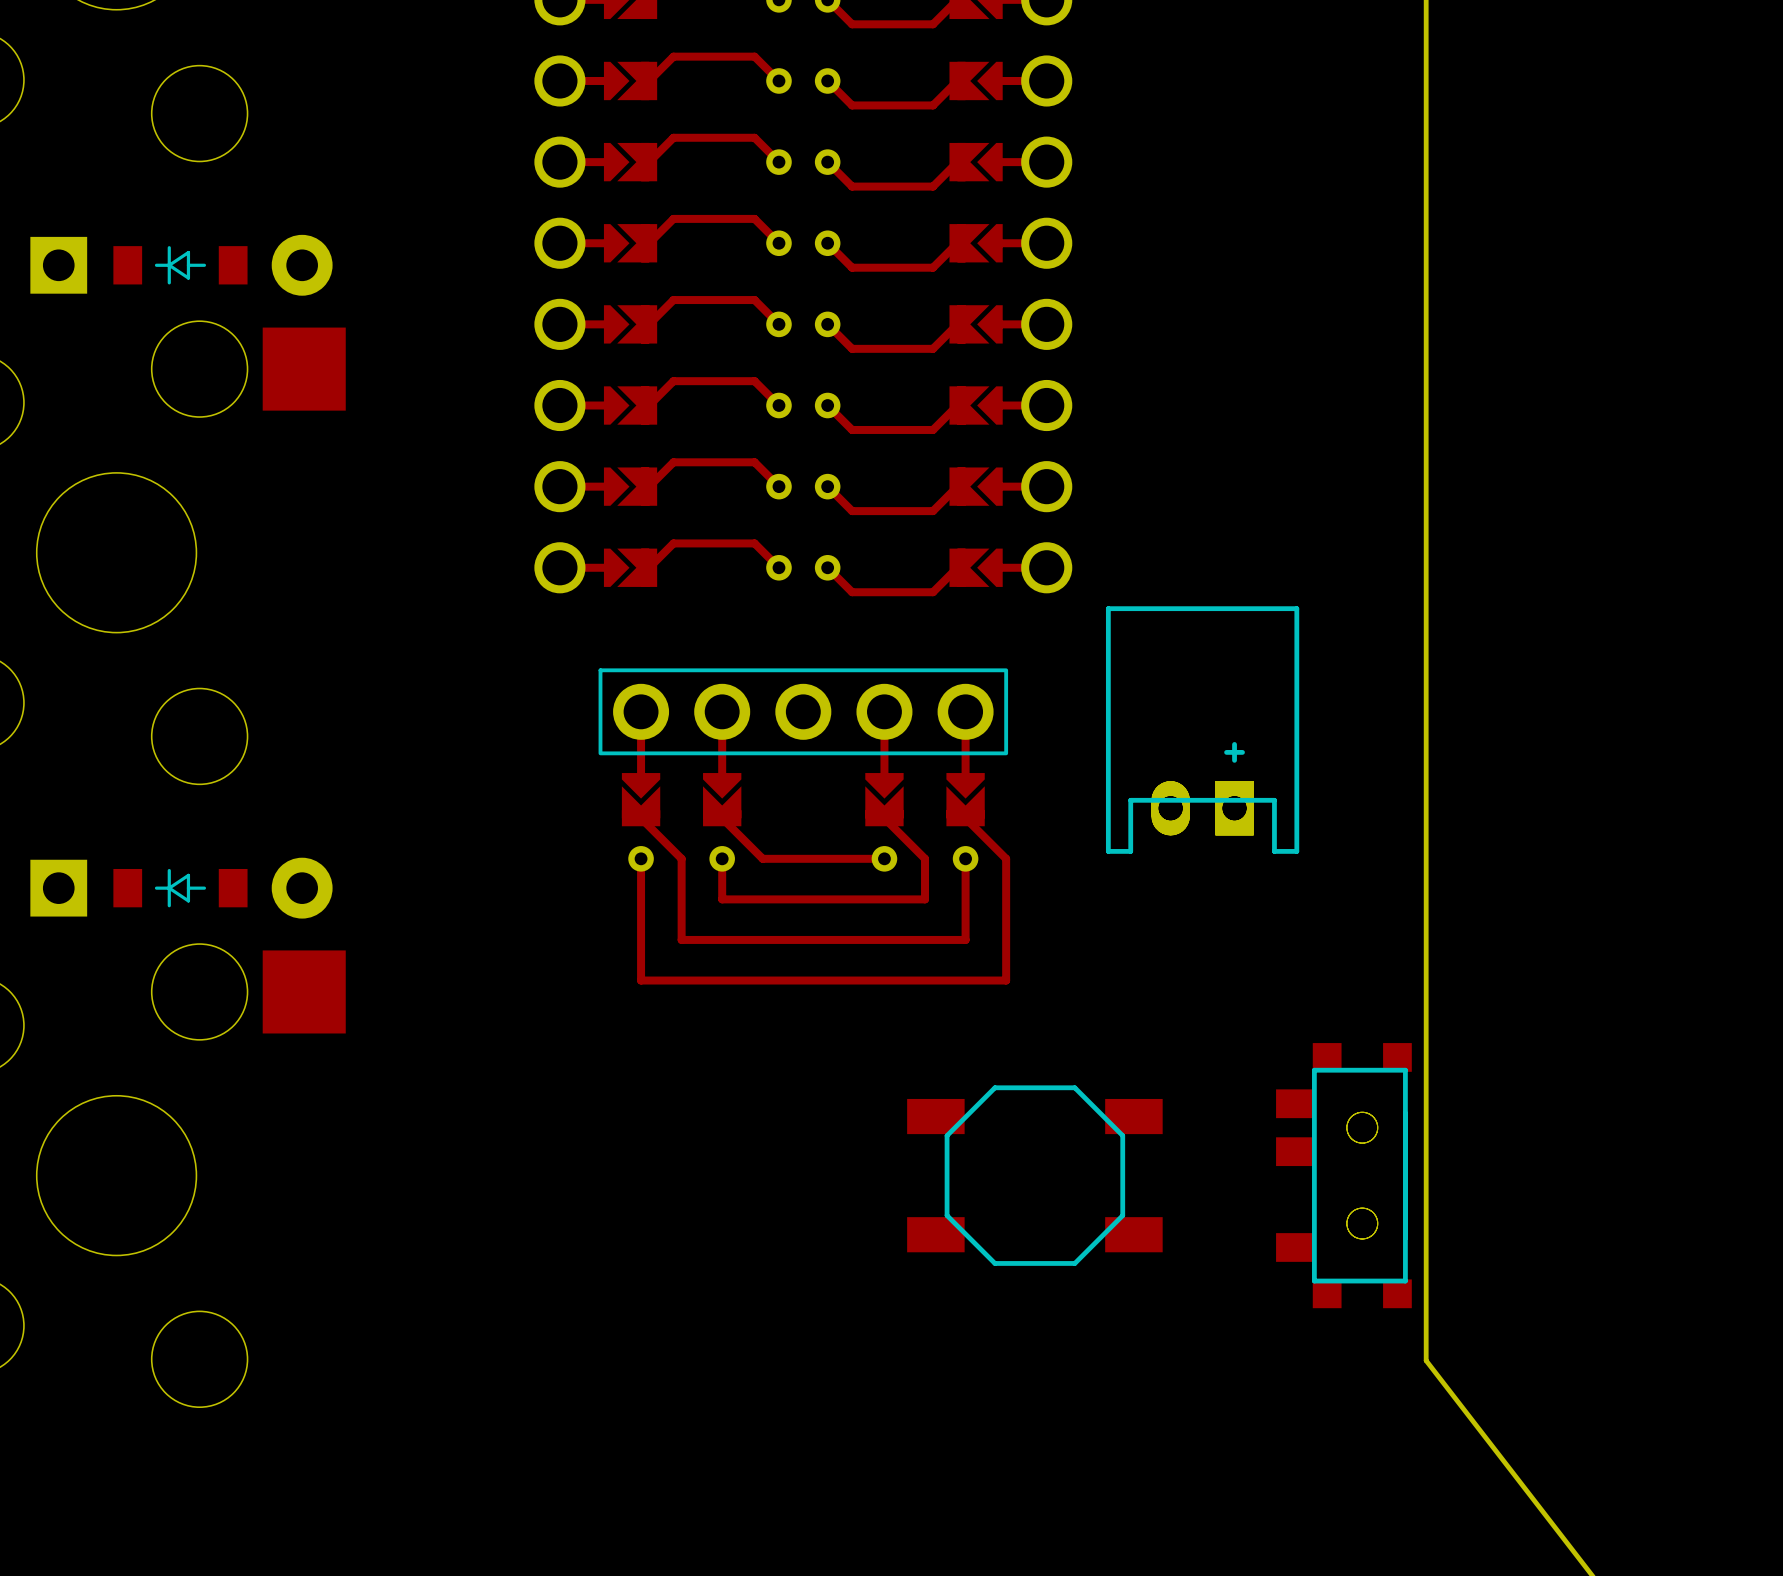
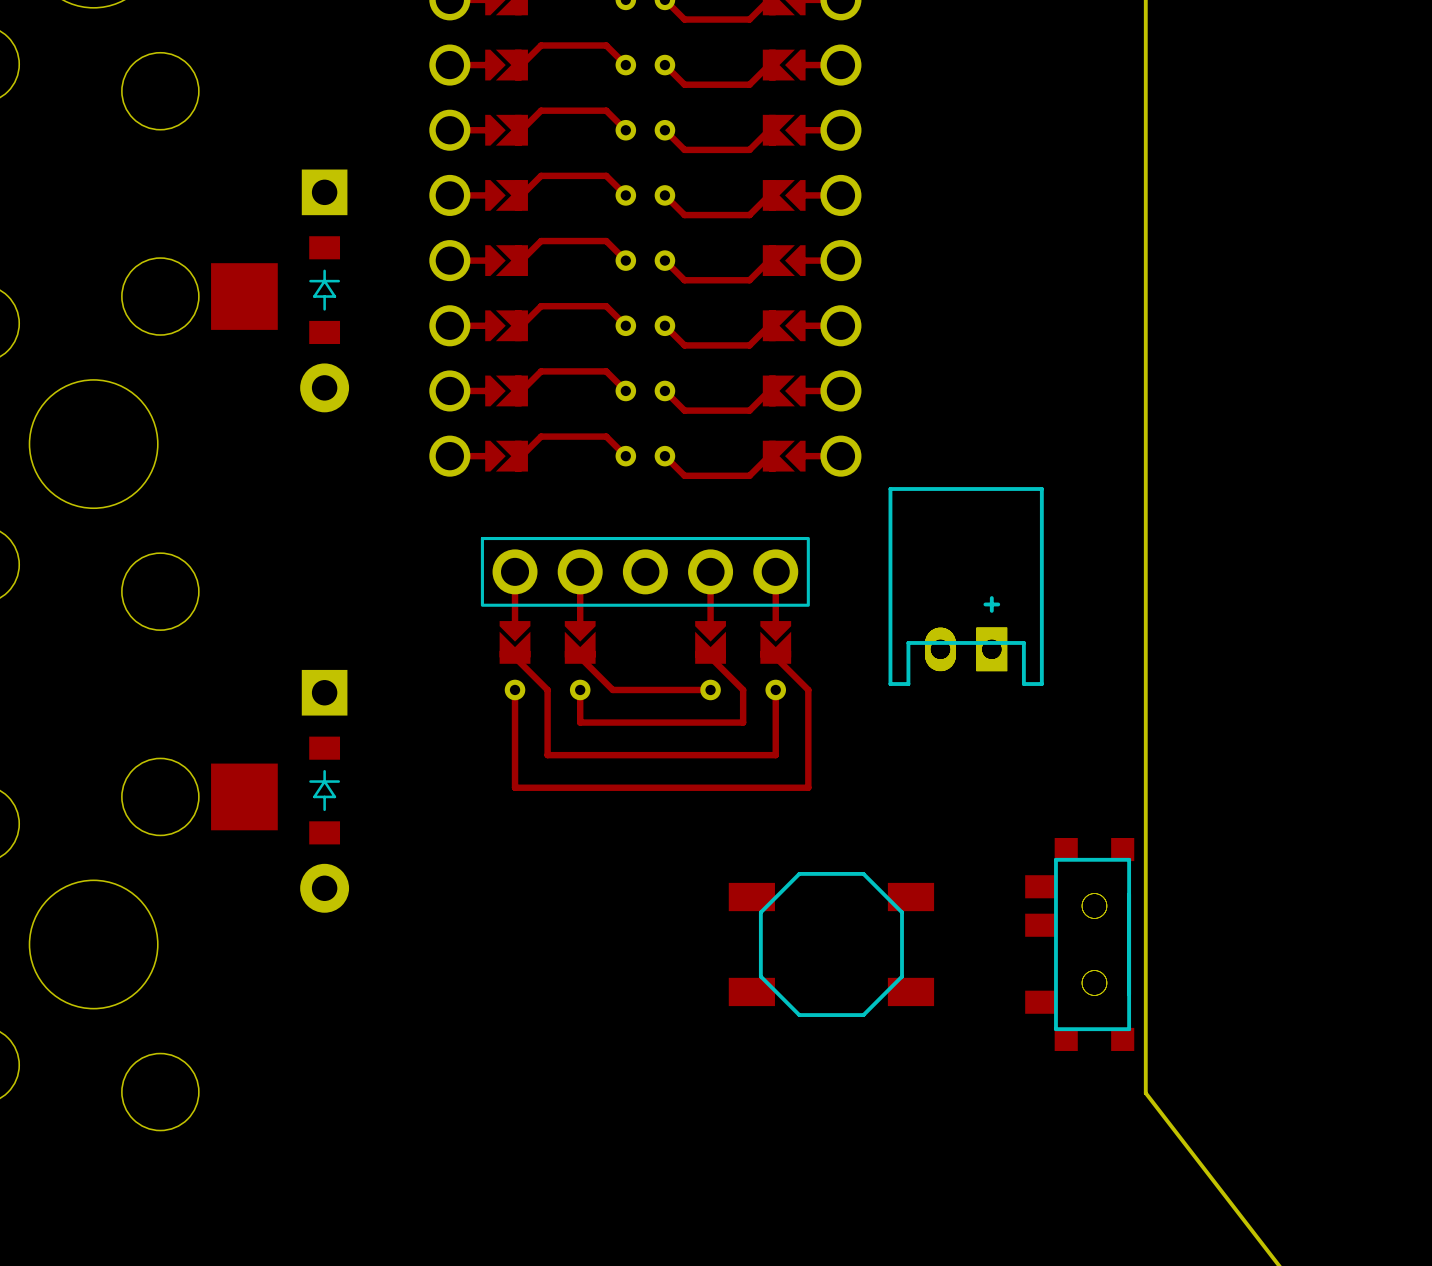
part rotation: 0° (181, 265) -> 90° clockwise (324, 290)
part position: (181, 265) -> (324, 290)
part rotation: 0° (181, 888) -> 90° clockwise (324, 791)
part position: (181, 888) -> (324, 791)

